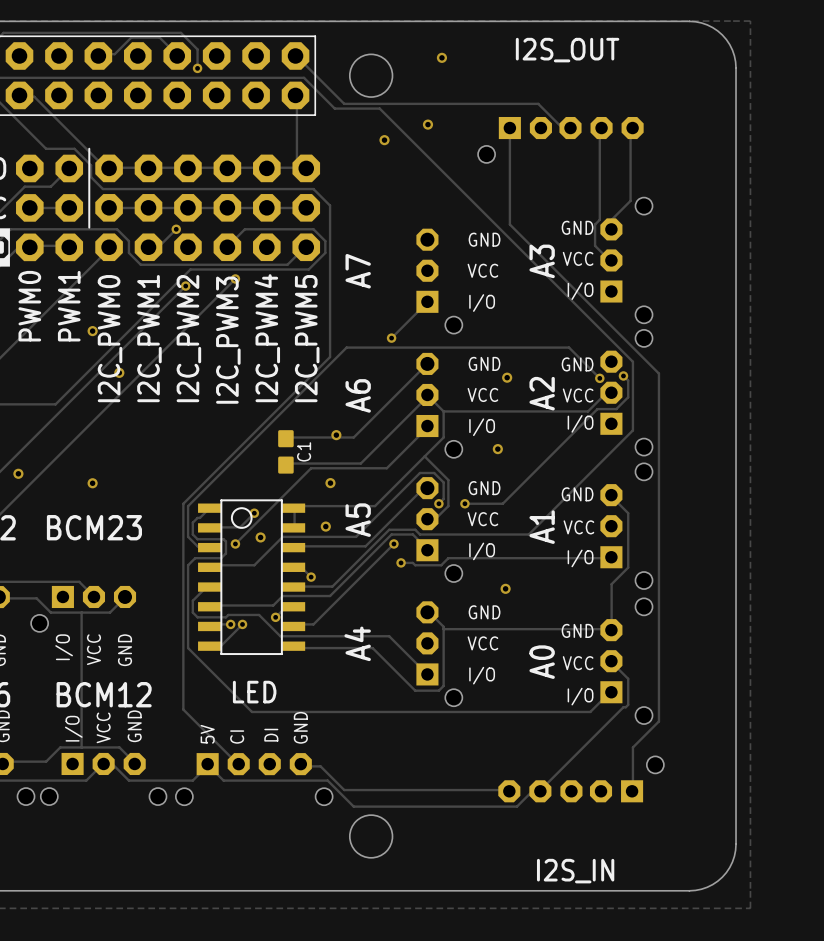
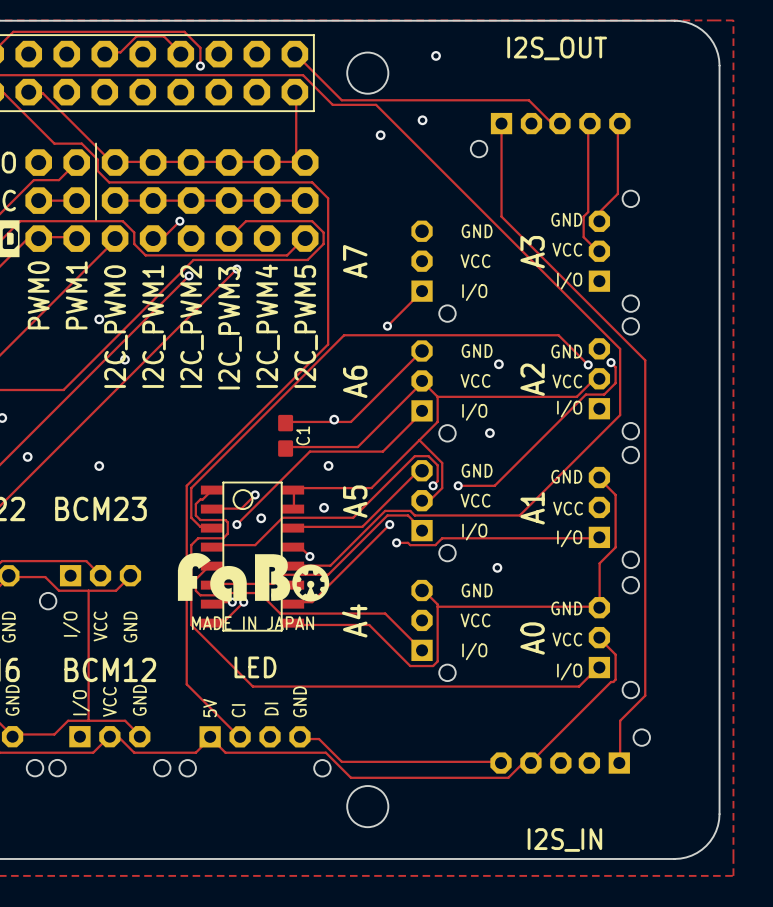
drawing: none -> [177, 553, 330, 602]
text: none -> MADE IN JAPAN (253, 623)

